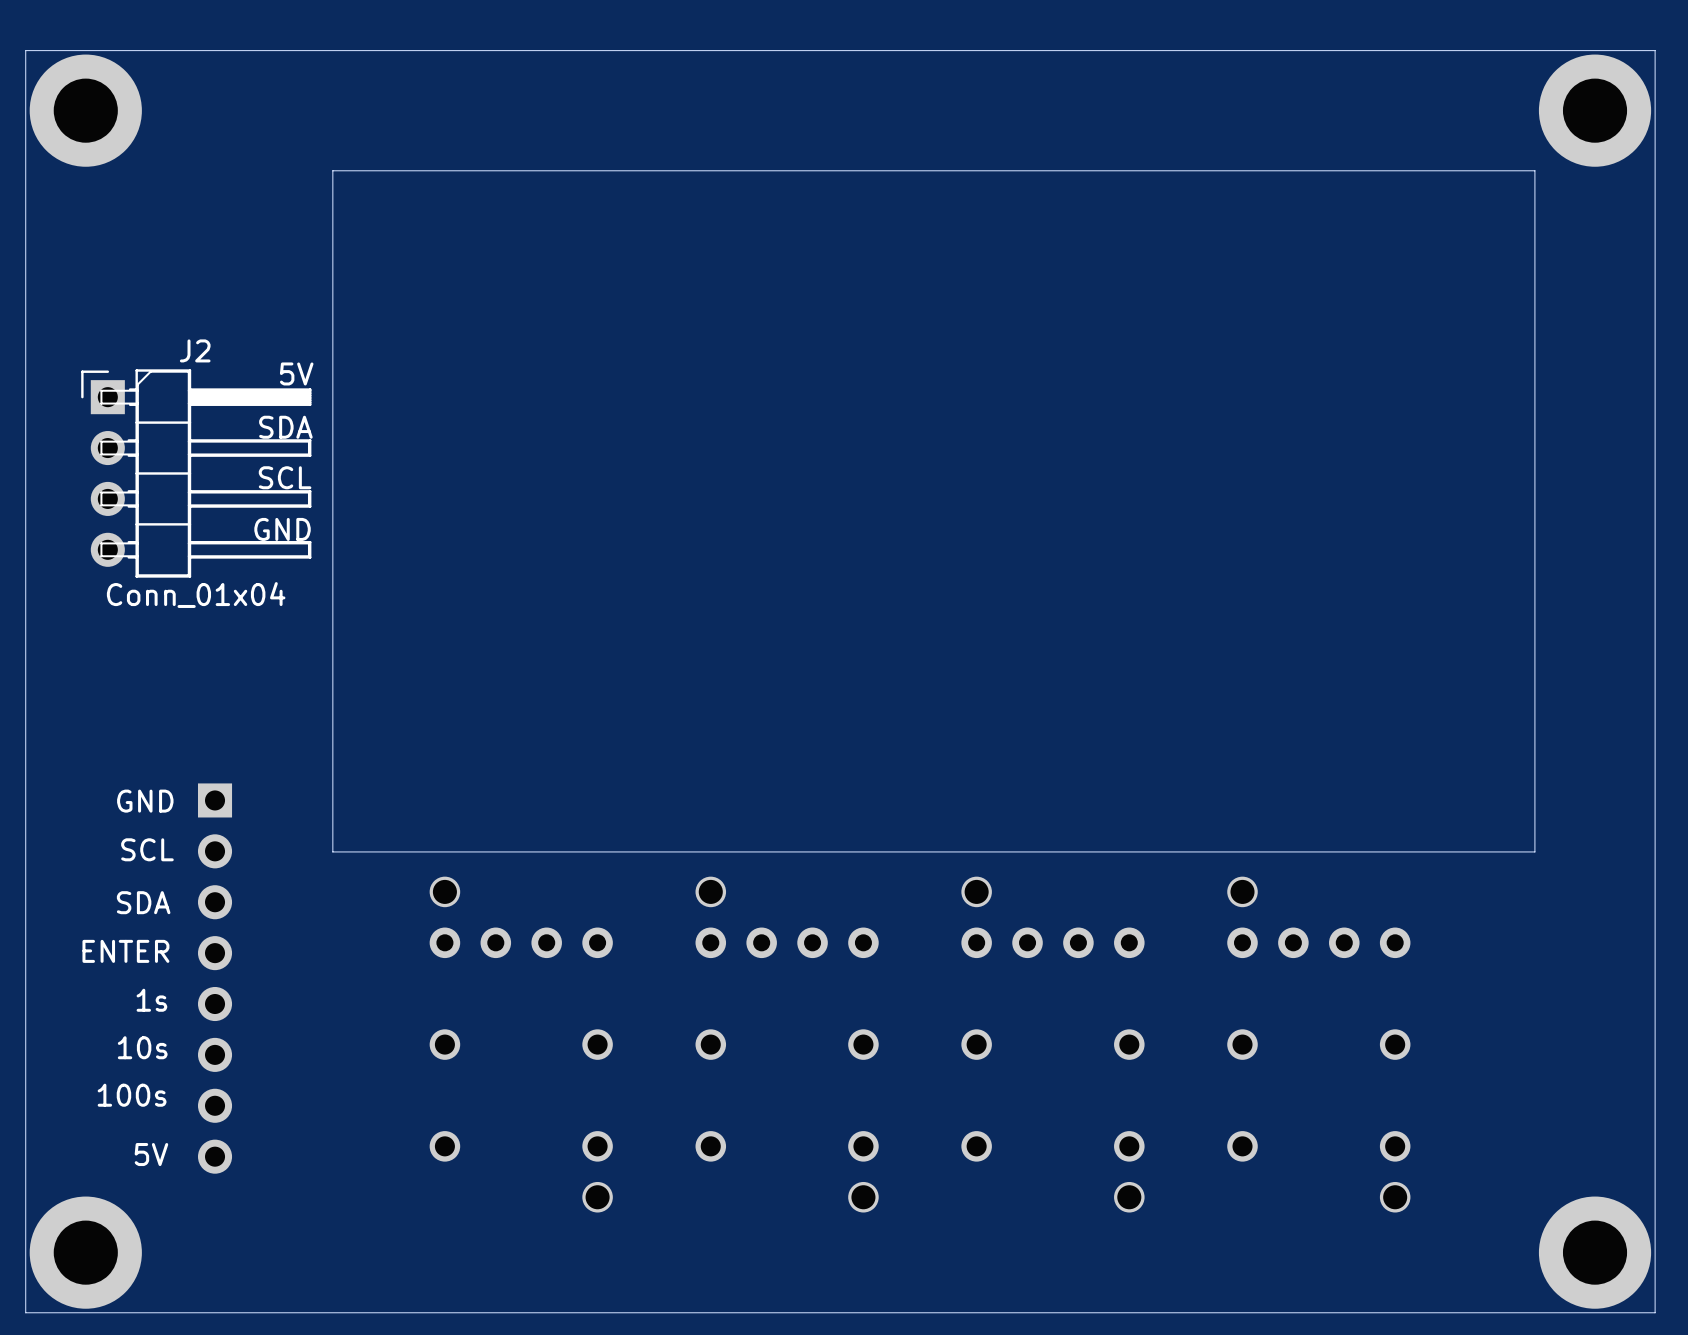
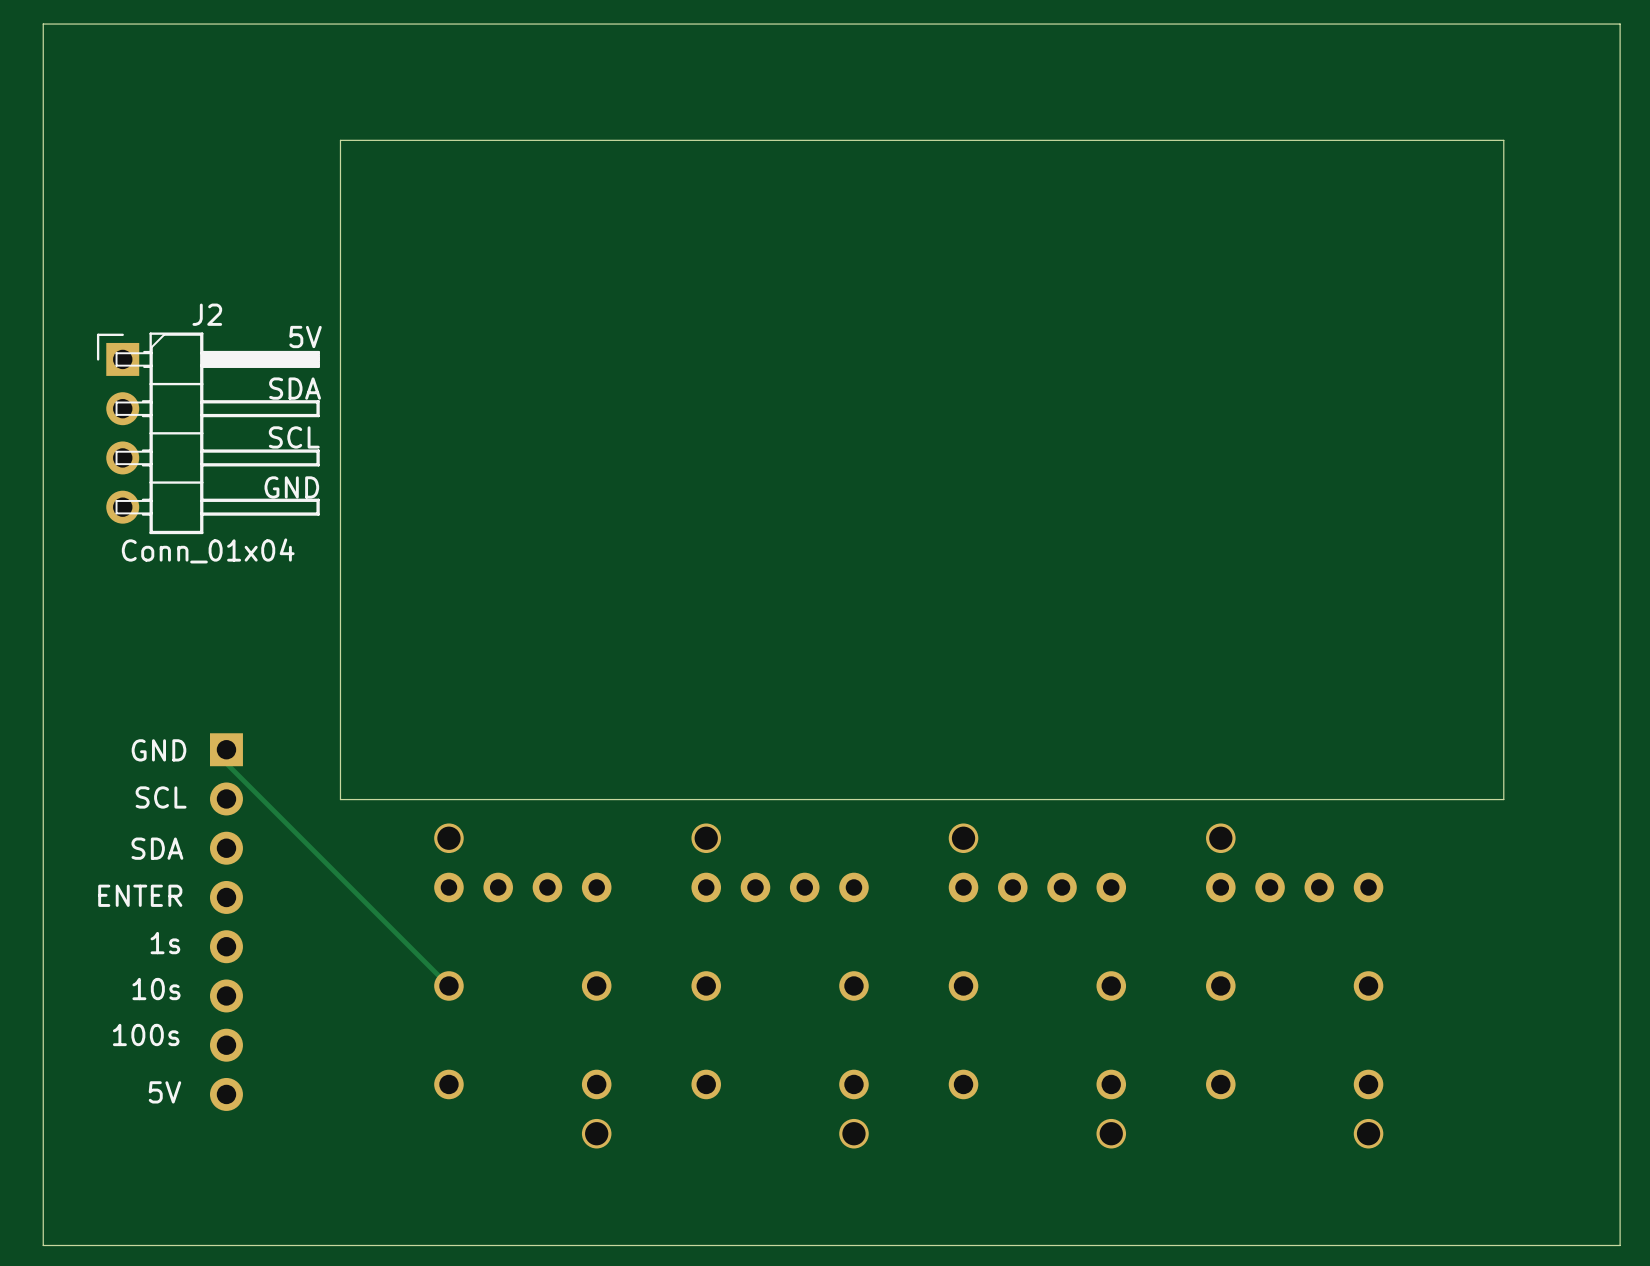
part: (85, 110) -> none
part: (1595, 110) -> none
track: none -> (226, 749) (226, 763) (448, 985)
part: (85, 1252) -> none
part: (1595, 1252) -> none

